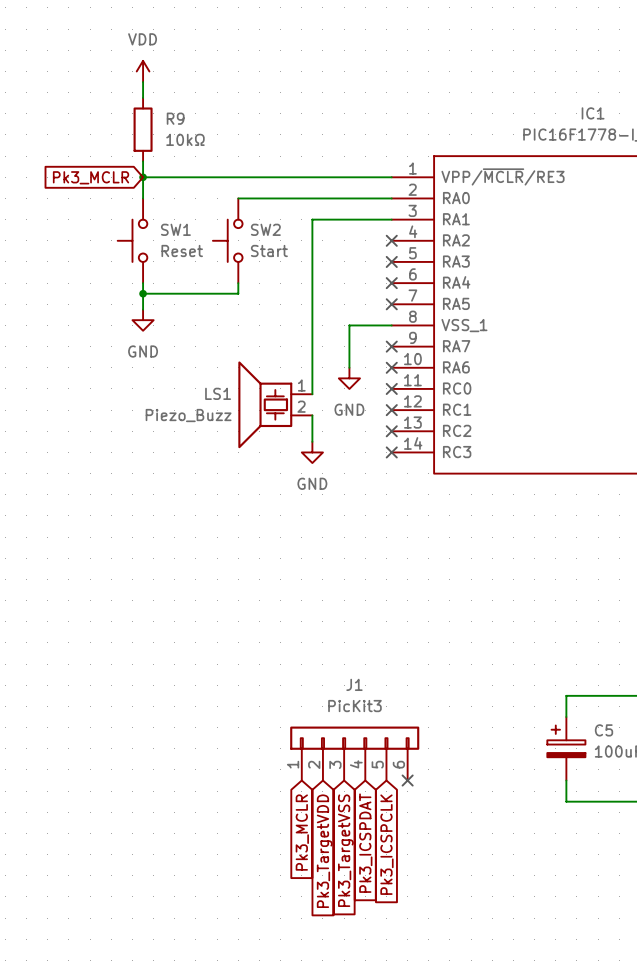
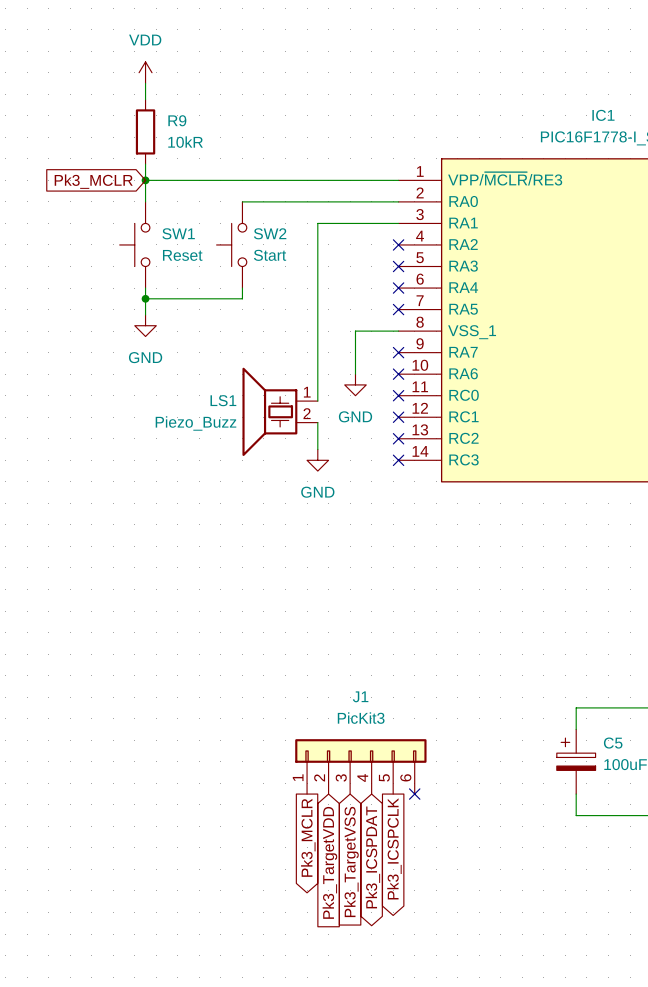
R9 value: 10kΩ (185, 139) -> 10kR (185, 142)
global label shape: input (302, 832) -> output (308, 837)
global label shape: input (365, 843) -> bidirectional (372, 857)
global label shape: input (386, 844) -> output (394, 848)

